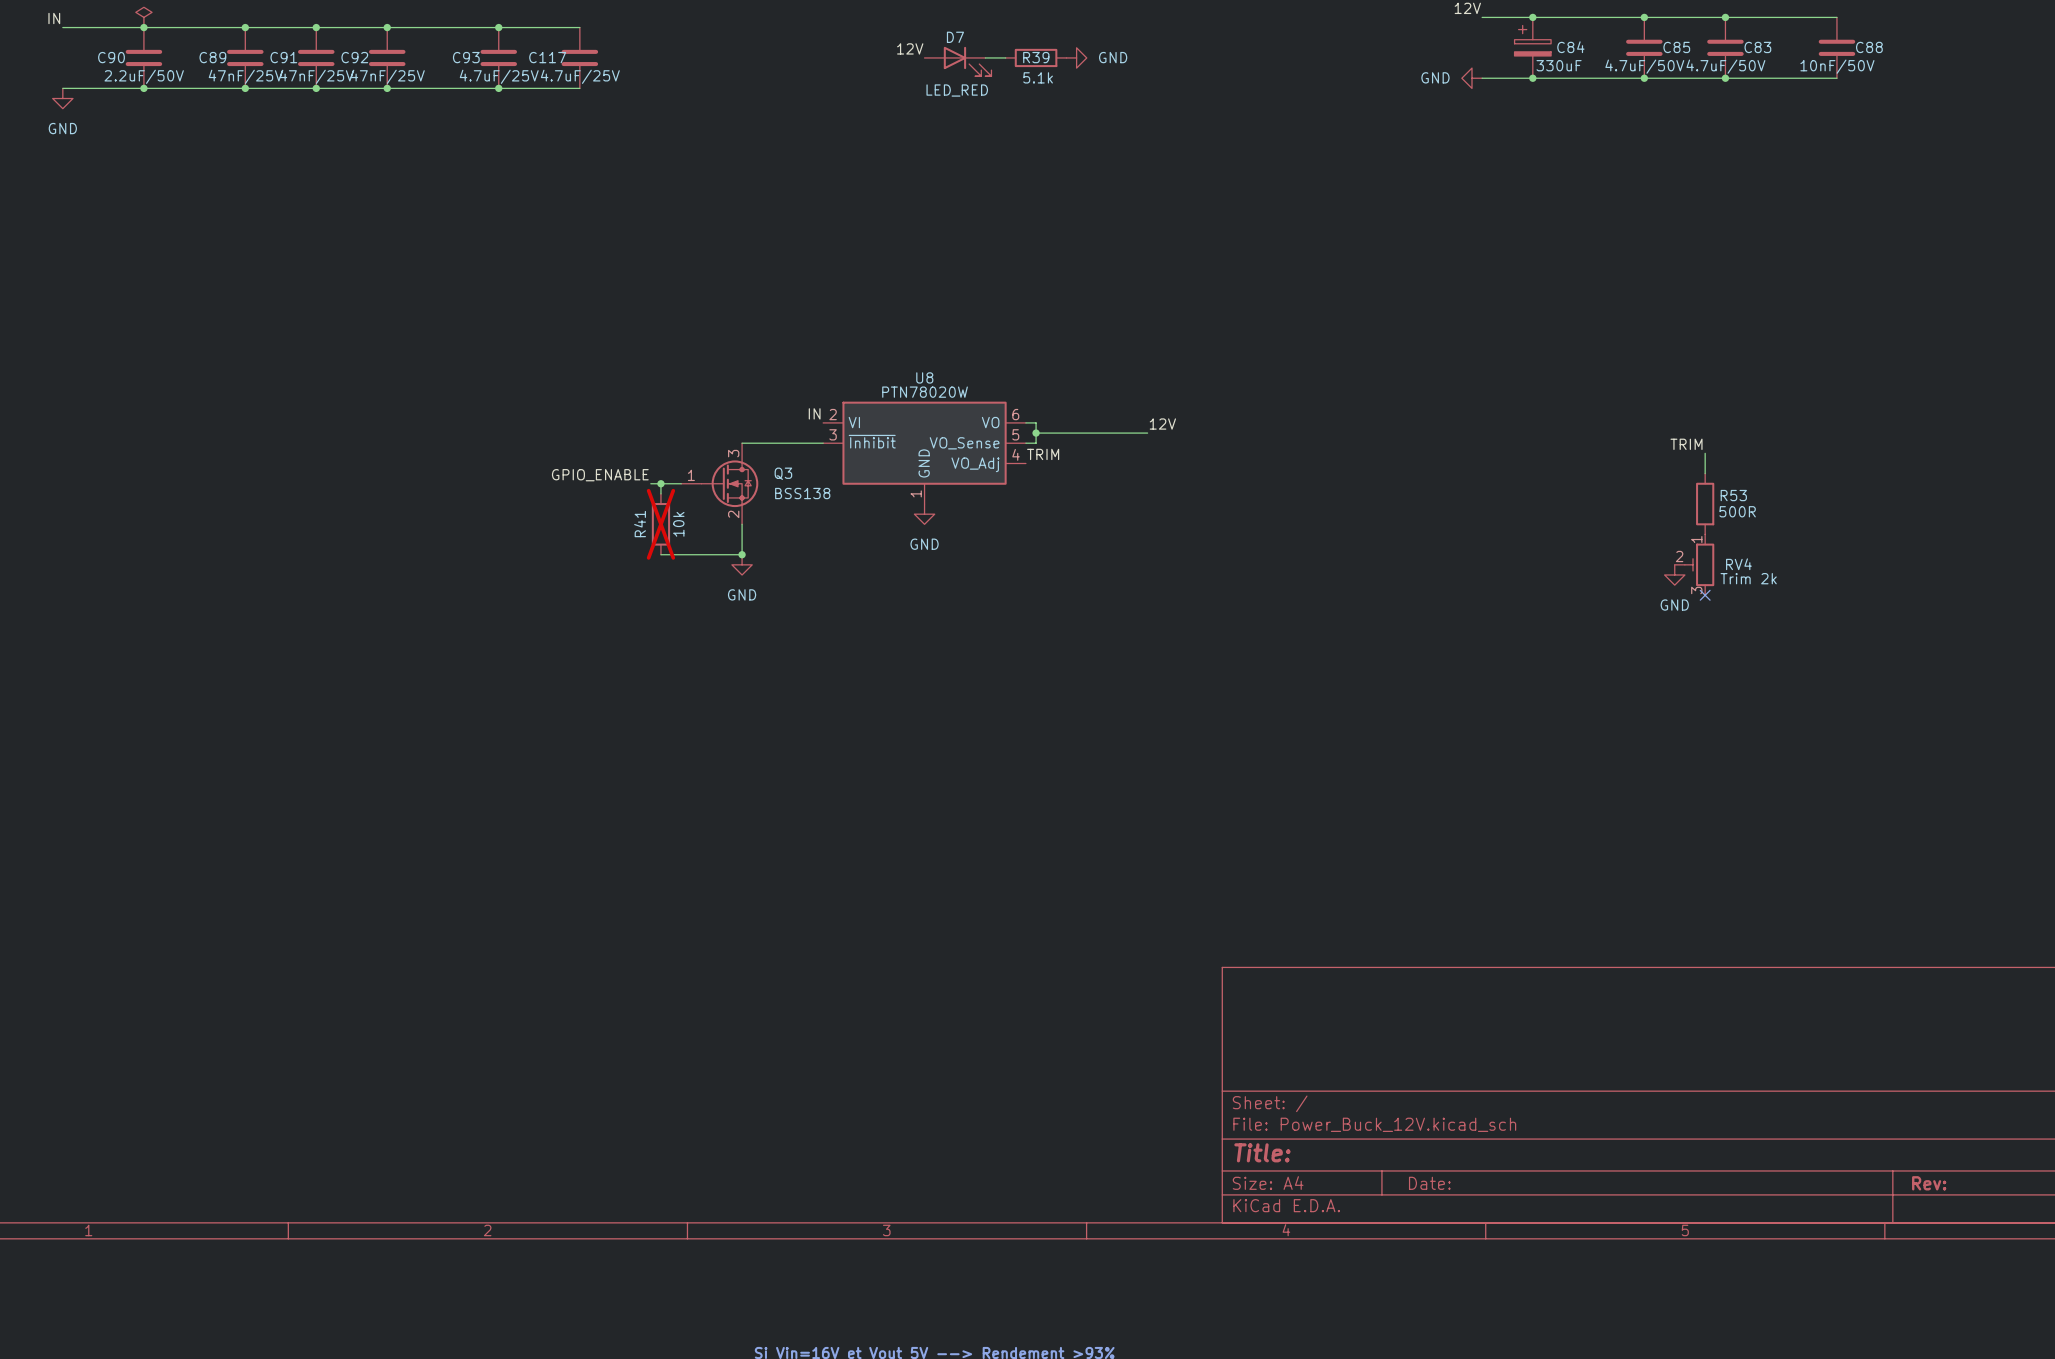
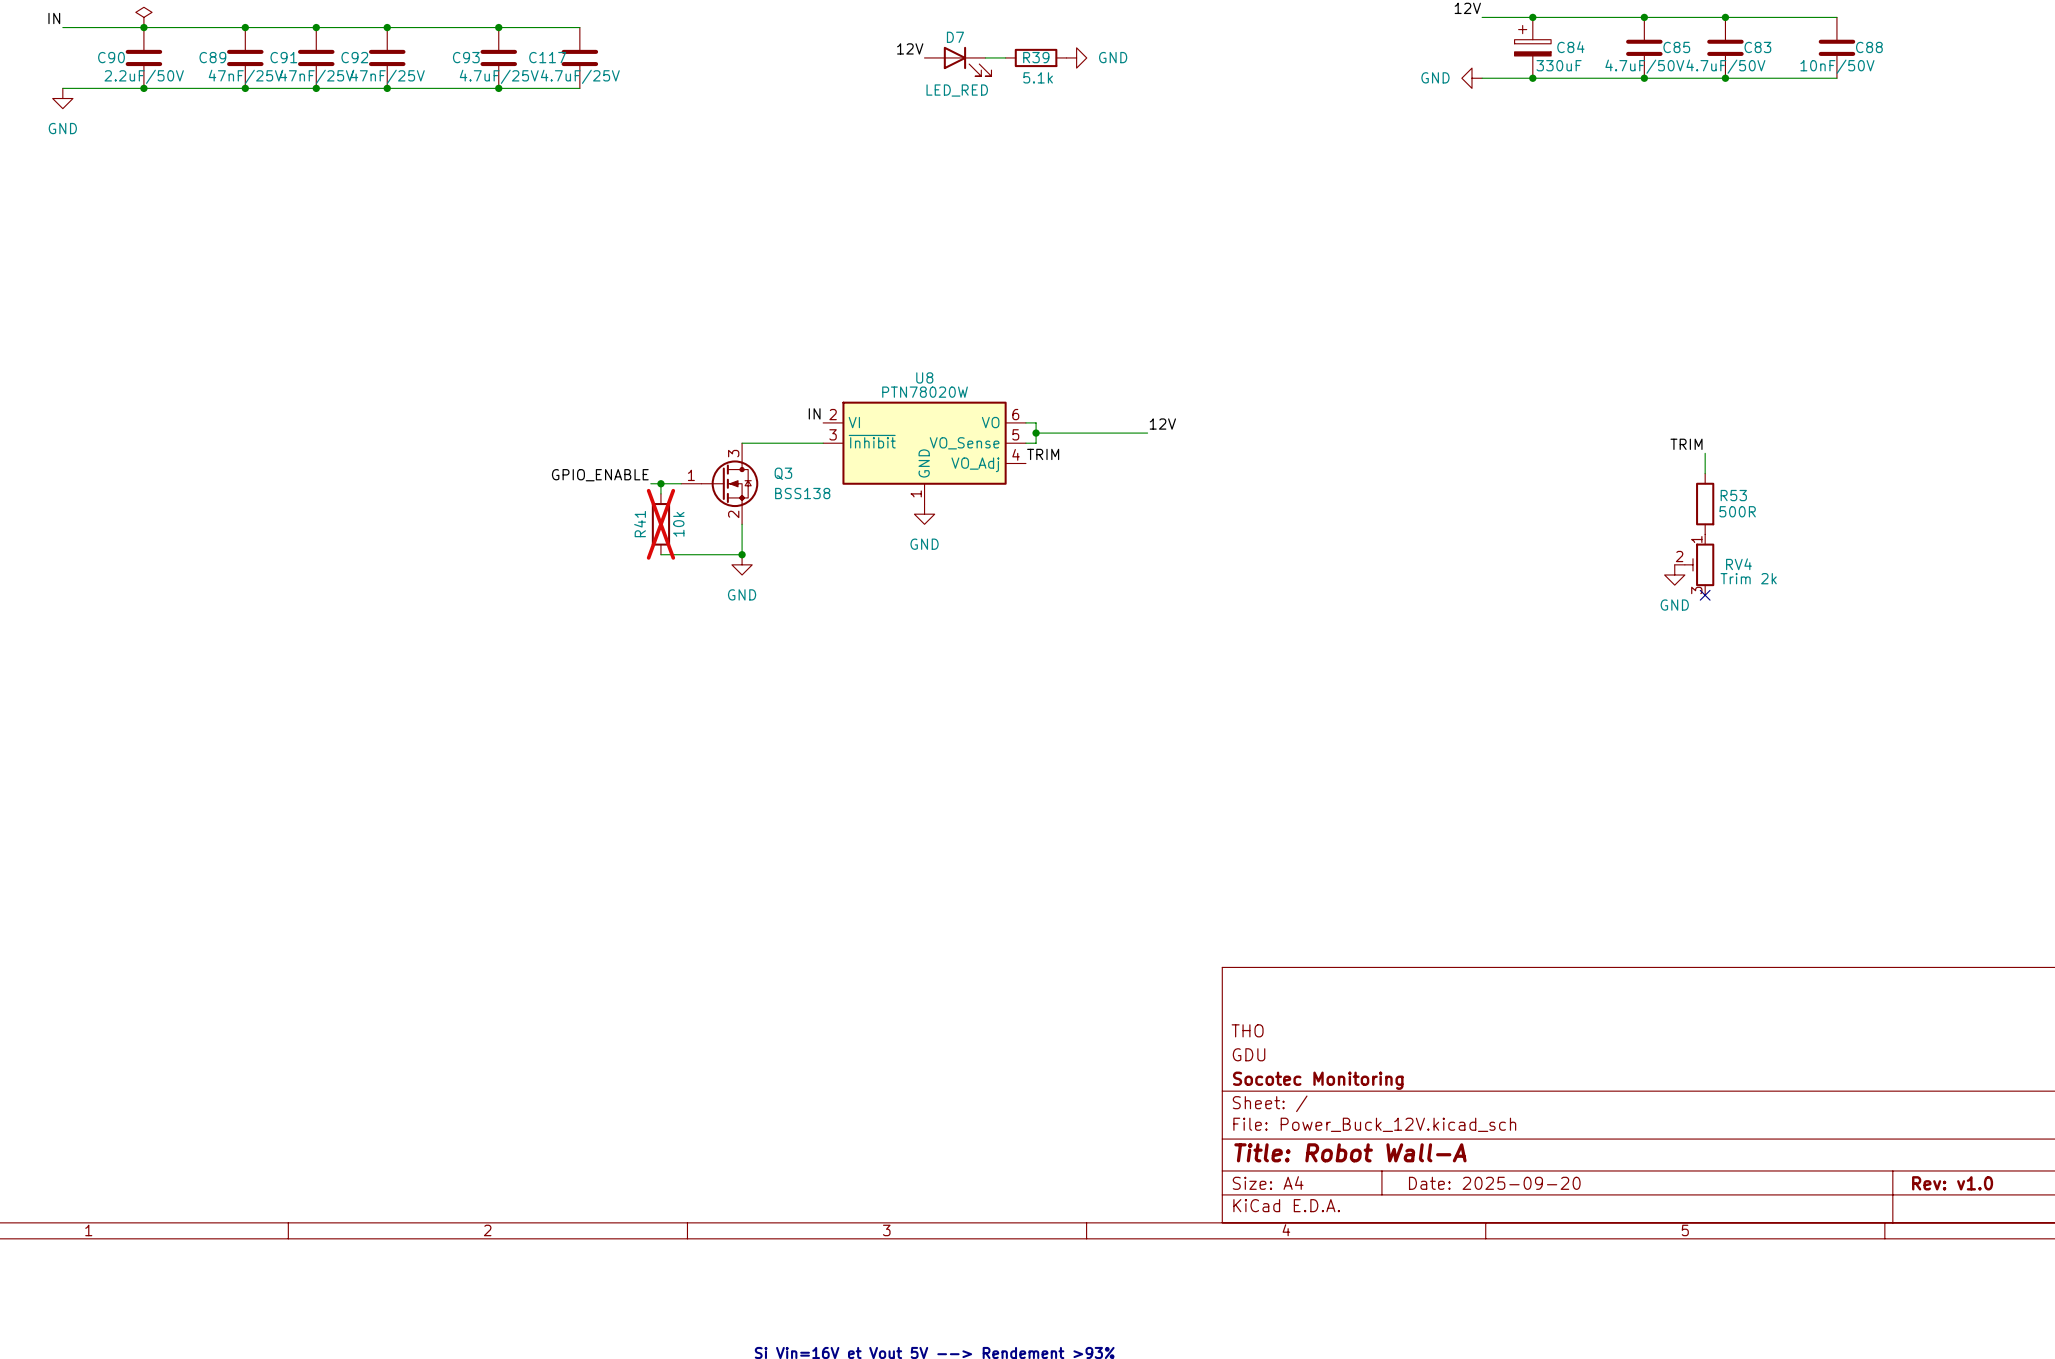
title block: none -> THO (1247, 1030)
title block: none -> GDU (1249, 1054)
title block: none -> Socotec Monitoring (1318, 1080)
title block: Title: (1262, 1152) -> Title: Robot Wall-A (1350, 1152)
title block: Date: (1429, 1183) -> Date: 2025-09-20 (1494, 1183)
title block: Rev: (1929, 1183) -> Rev: v1.0 (1952, 1183)

